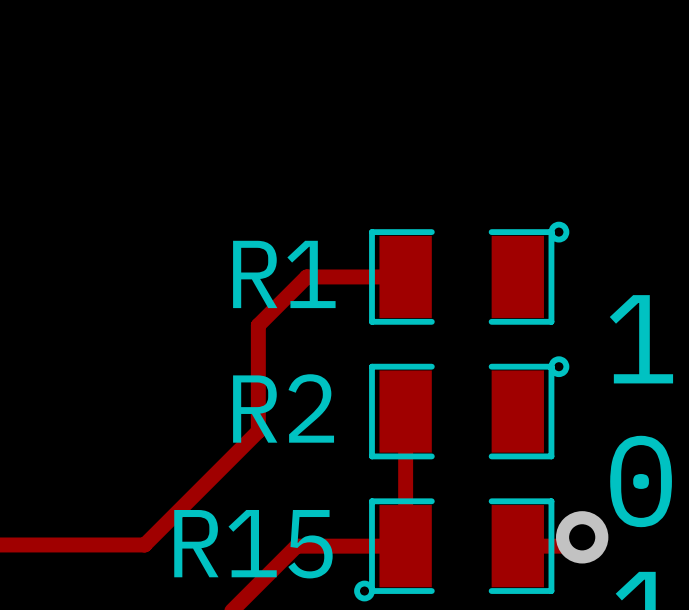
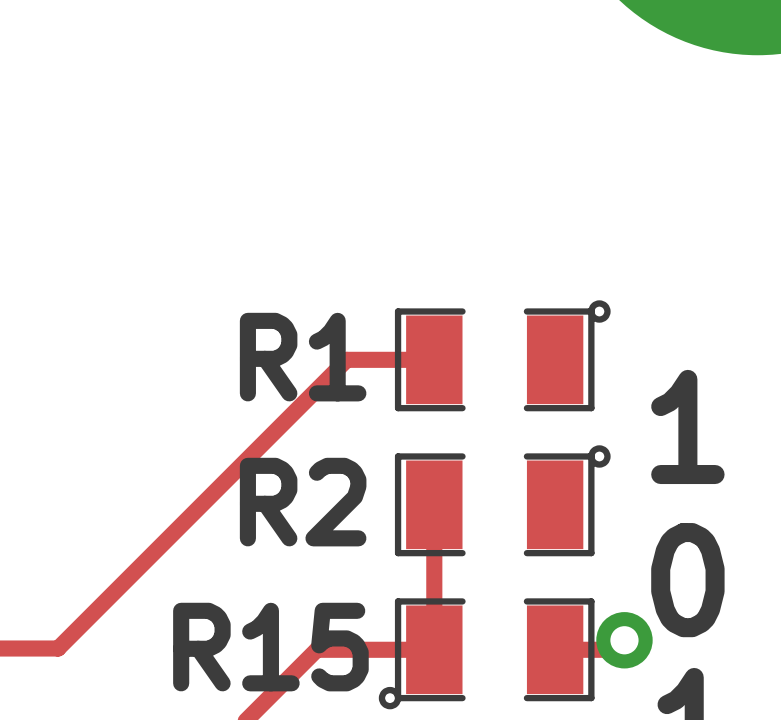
top track: (324, 276) (306, 276) (258, 325) (258, 431) (144, 544) (56, 544) -> (346, 359) (58, 648)

